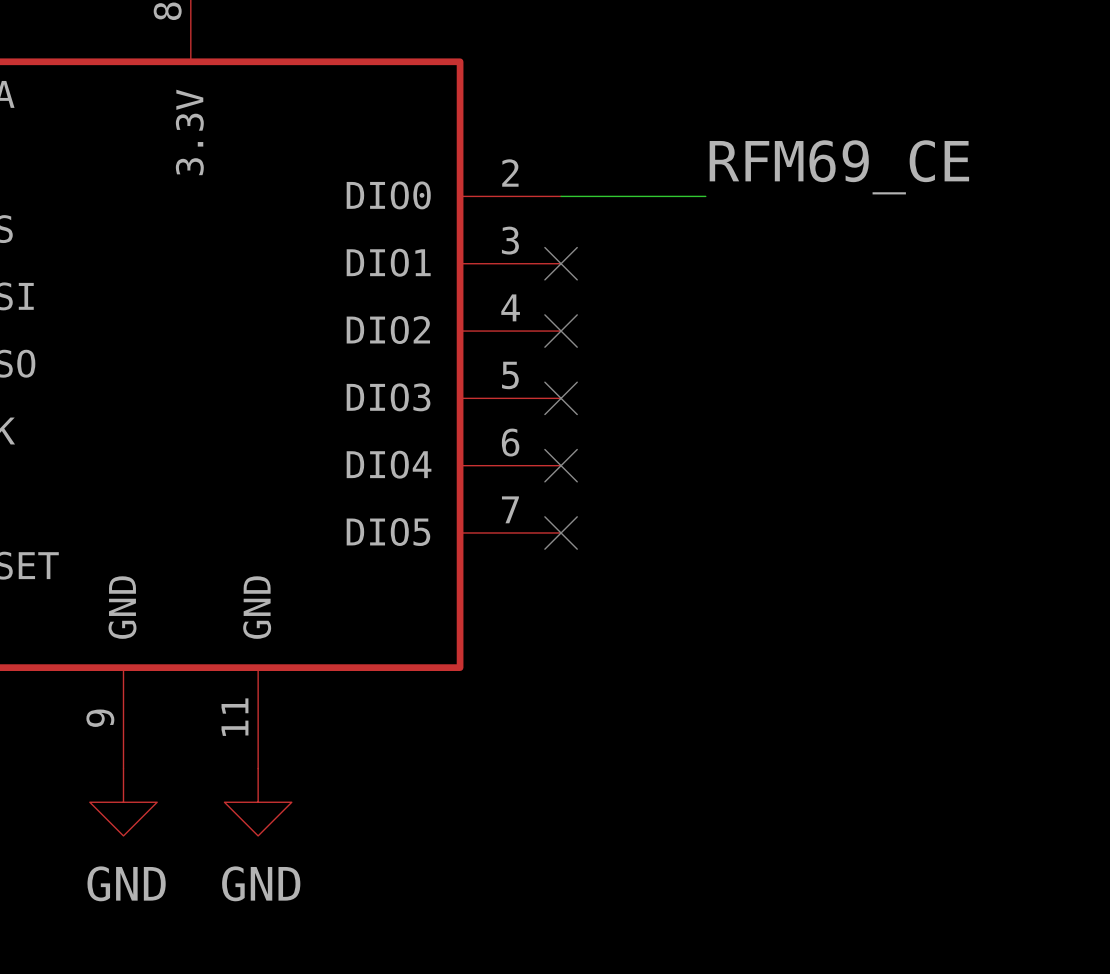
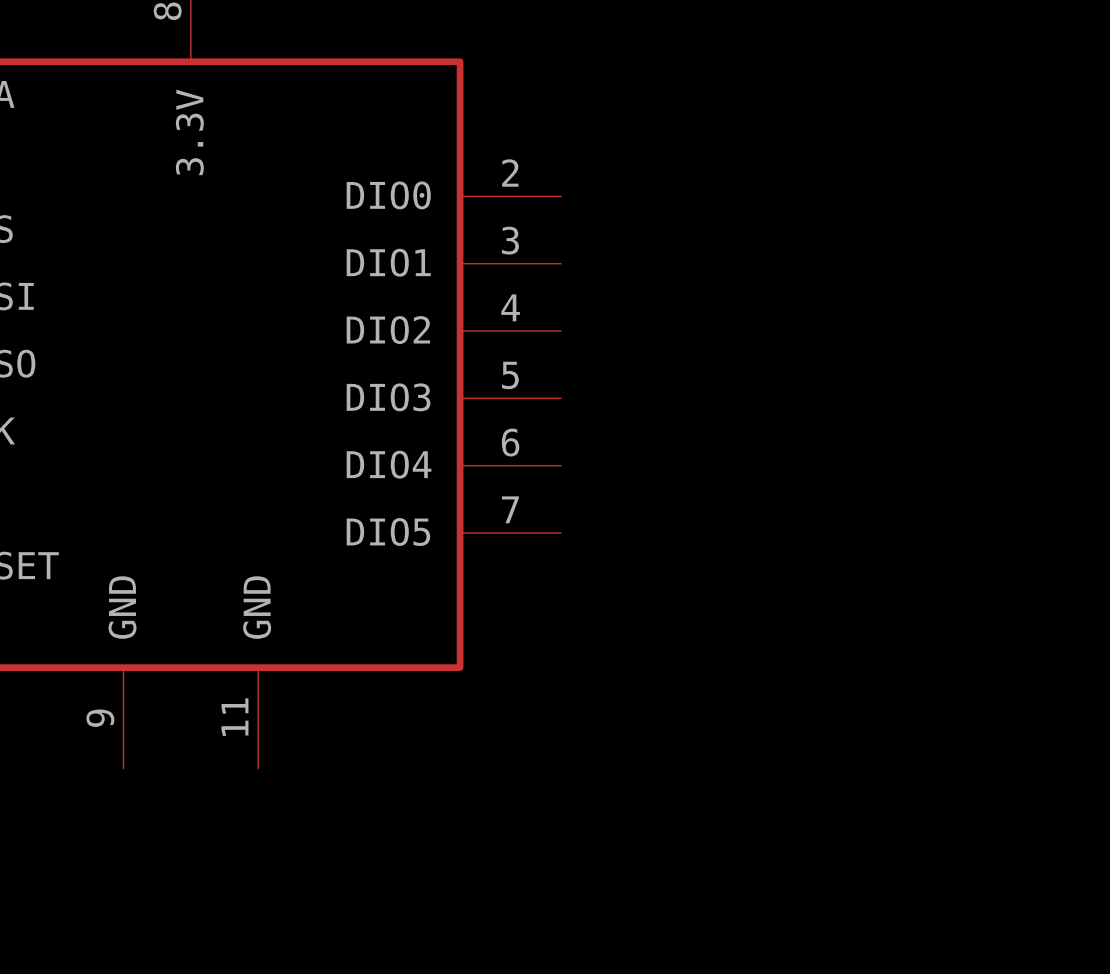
label: RFM69_CE (839, 167) -> none
wire: (561, 196) (705, 196) -> none
no-connect mark: (561, 263) -> none
no-connect mark: (561, 331) -> none
no-connect mark: (561, 398) -> none
no-connect mark: (561, 465) -> none
no-connect mark: (561, 532) -> none
power symbol: GND (123, 802) -> none
power symbol: GND (258, 802) -> none

